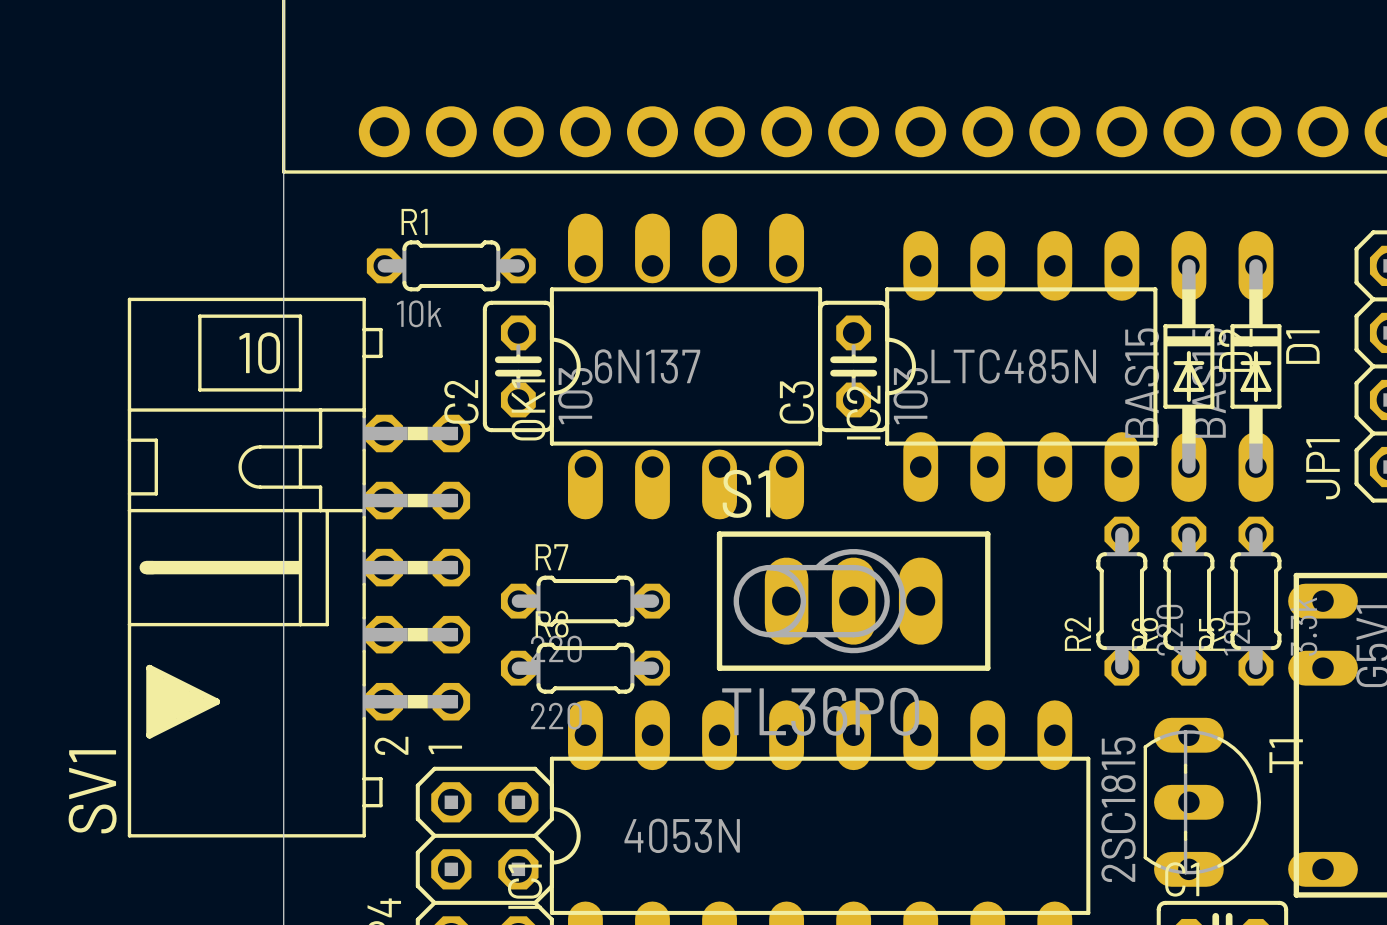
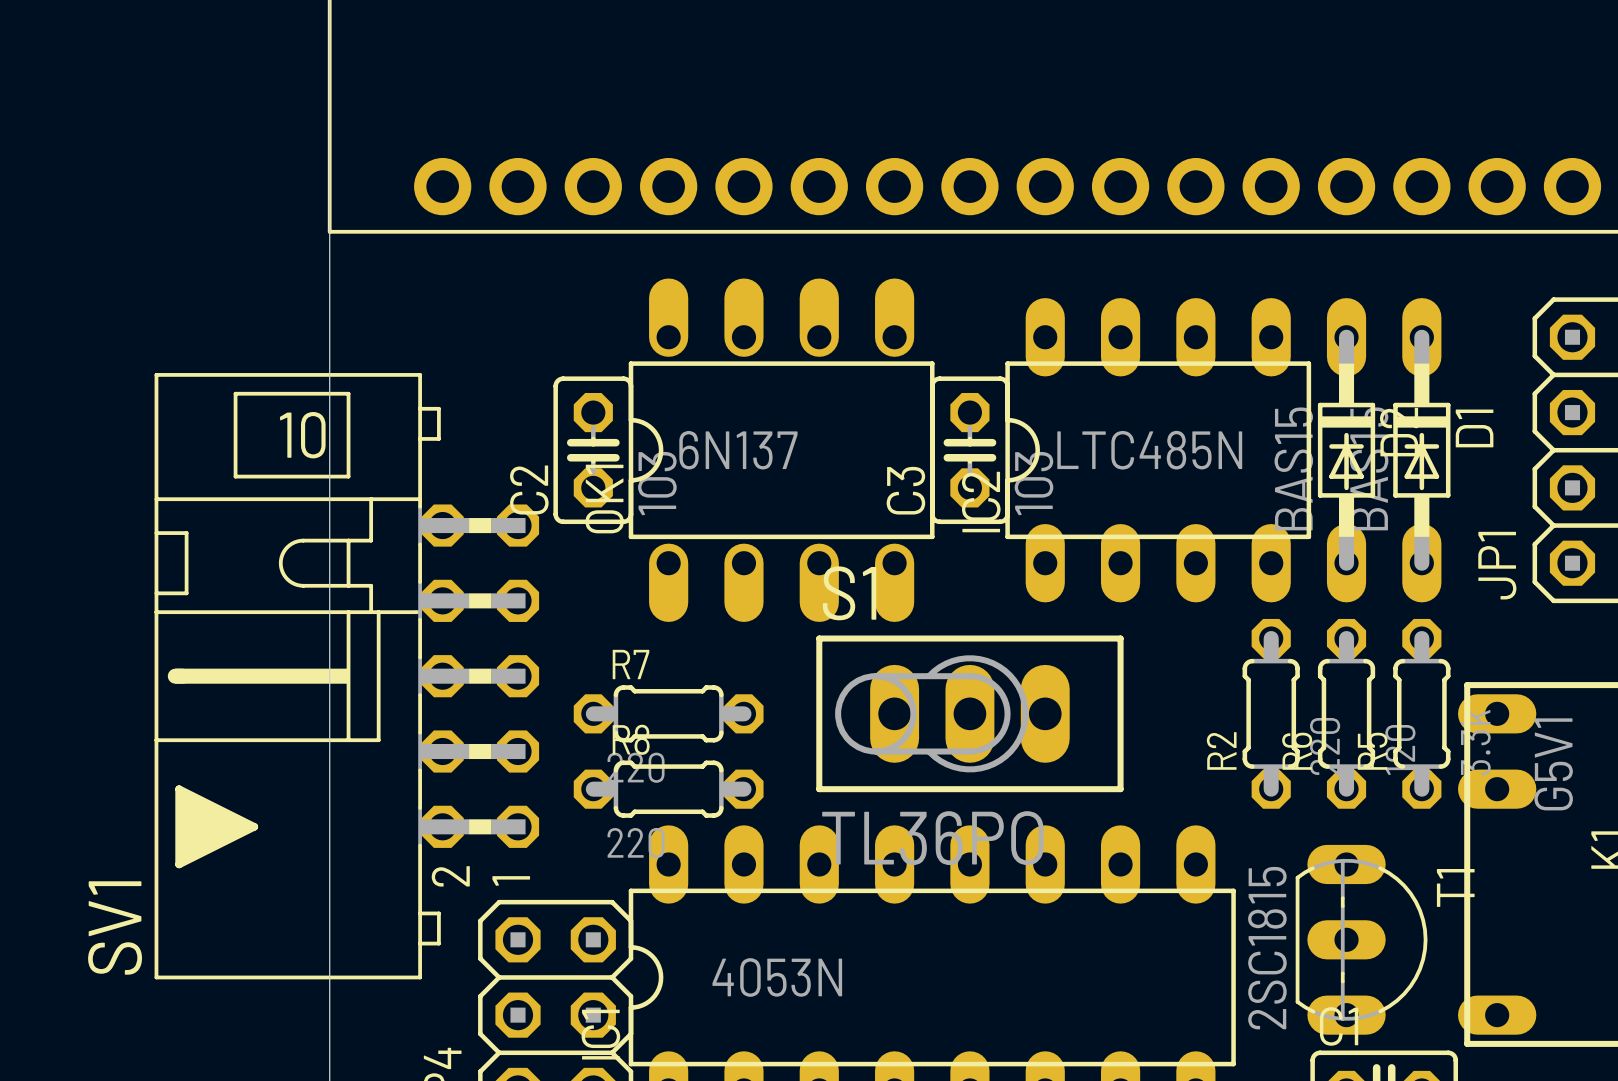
R1: 10k (451, 265) -> none

